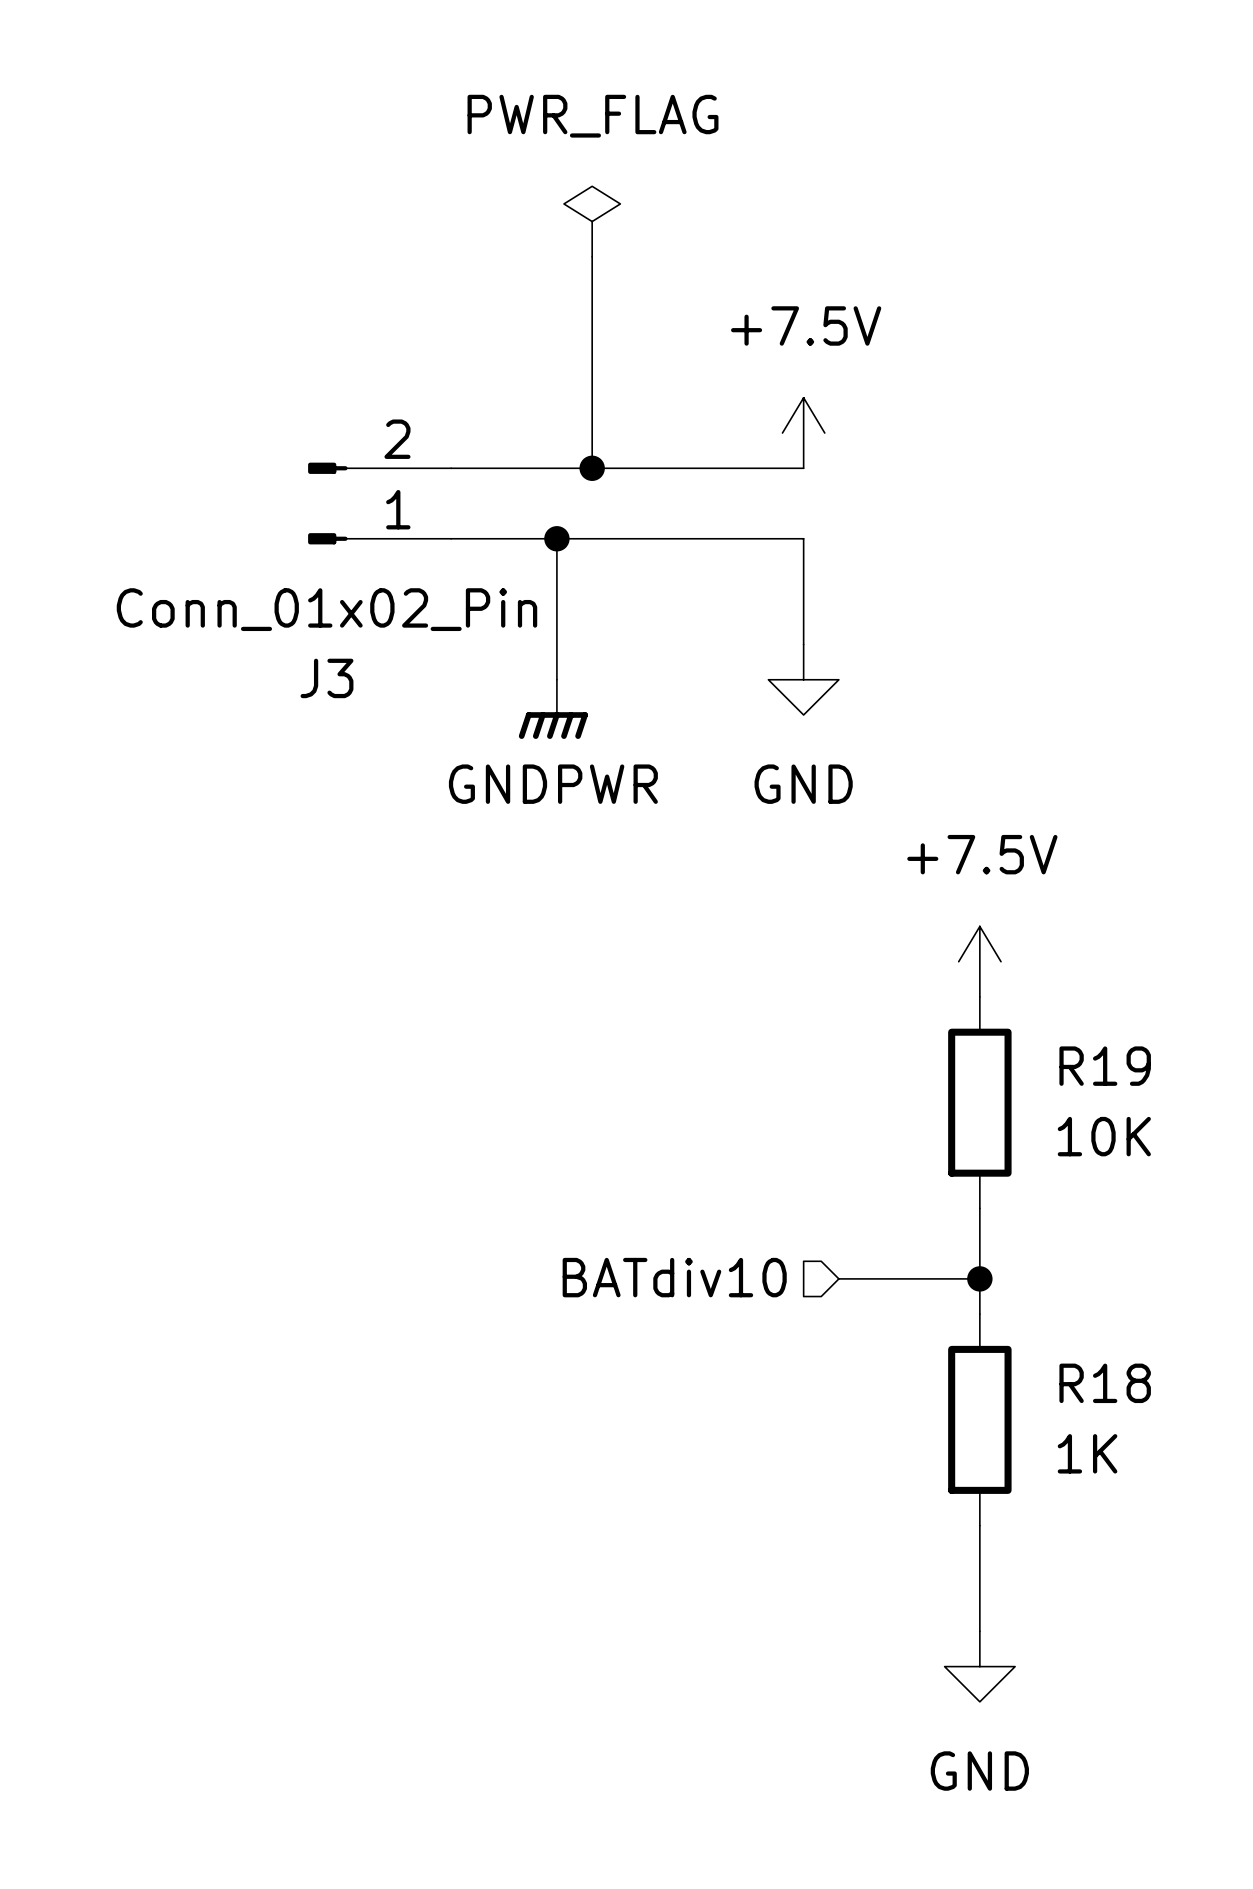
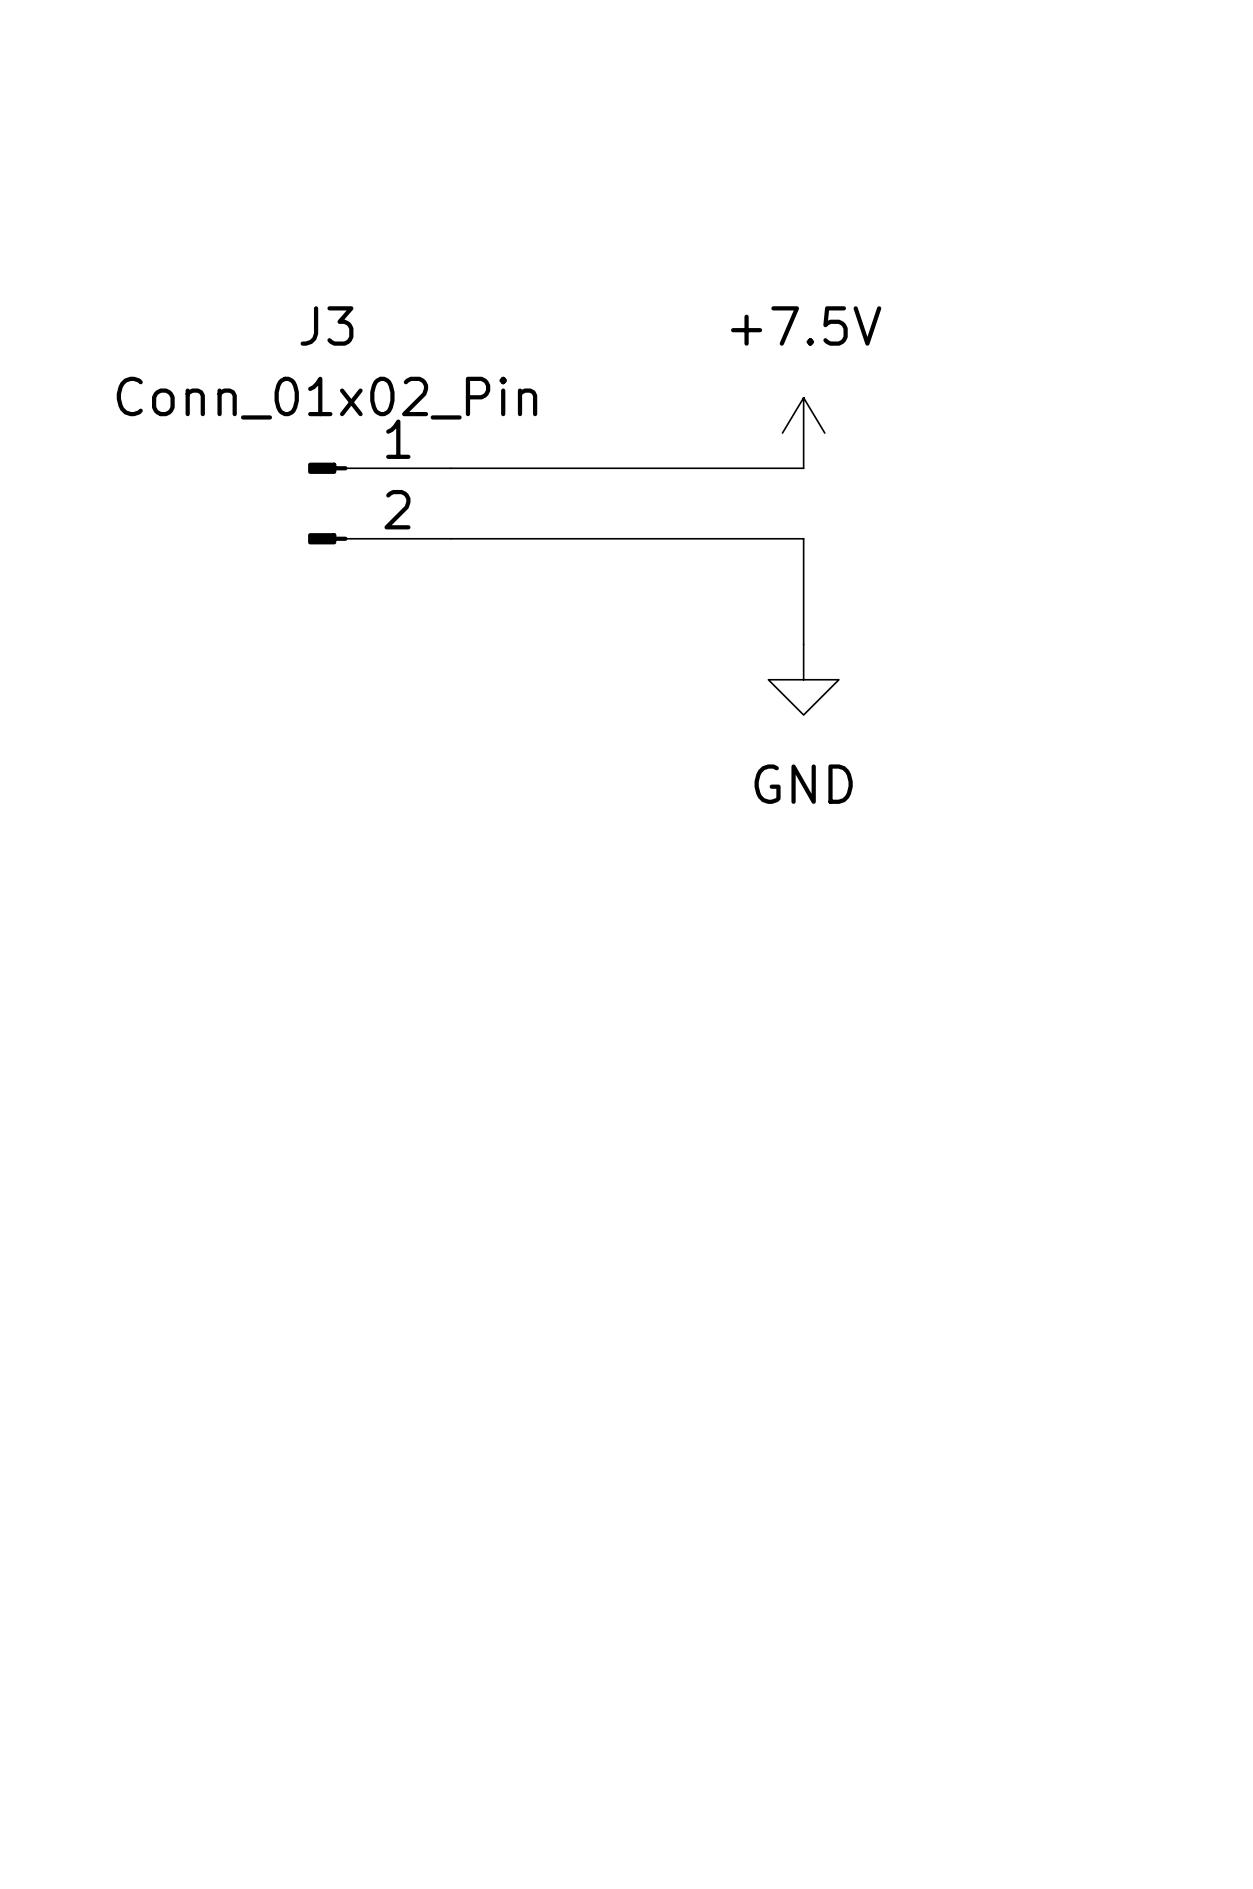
power symbol: PWR_FLAG (592, 221) -> none
wire: (592, 256) (592, 468) -> none
junction: (592, 468) -> none
J3 flip: as is (327, 503) -> up-down (327, 503)
wire: (556, 538) (556, 679) -> none
junction: (556, 538) -> none
power symbol: GNDPWR (553, 709) -> none
power symbol: +7.5V (979, 961) -> none
R19: 10K (979, 1102) -> none
wire: (979, 1208) (979, 1314) -> none
hierarchical label: BATdiv10 (674, 1277) -> none
wire: (838, 1278) (979, 1278) -> none
junction: (979, 1278) -> none
R18: 1K (979, 1419) -> none
wire: (979, 1525) (979, 1631) -> none
power symbol: GND (979, 1666) -> none

